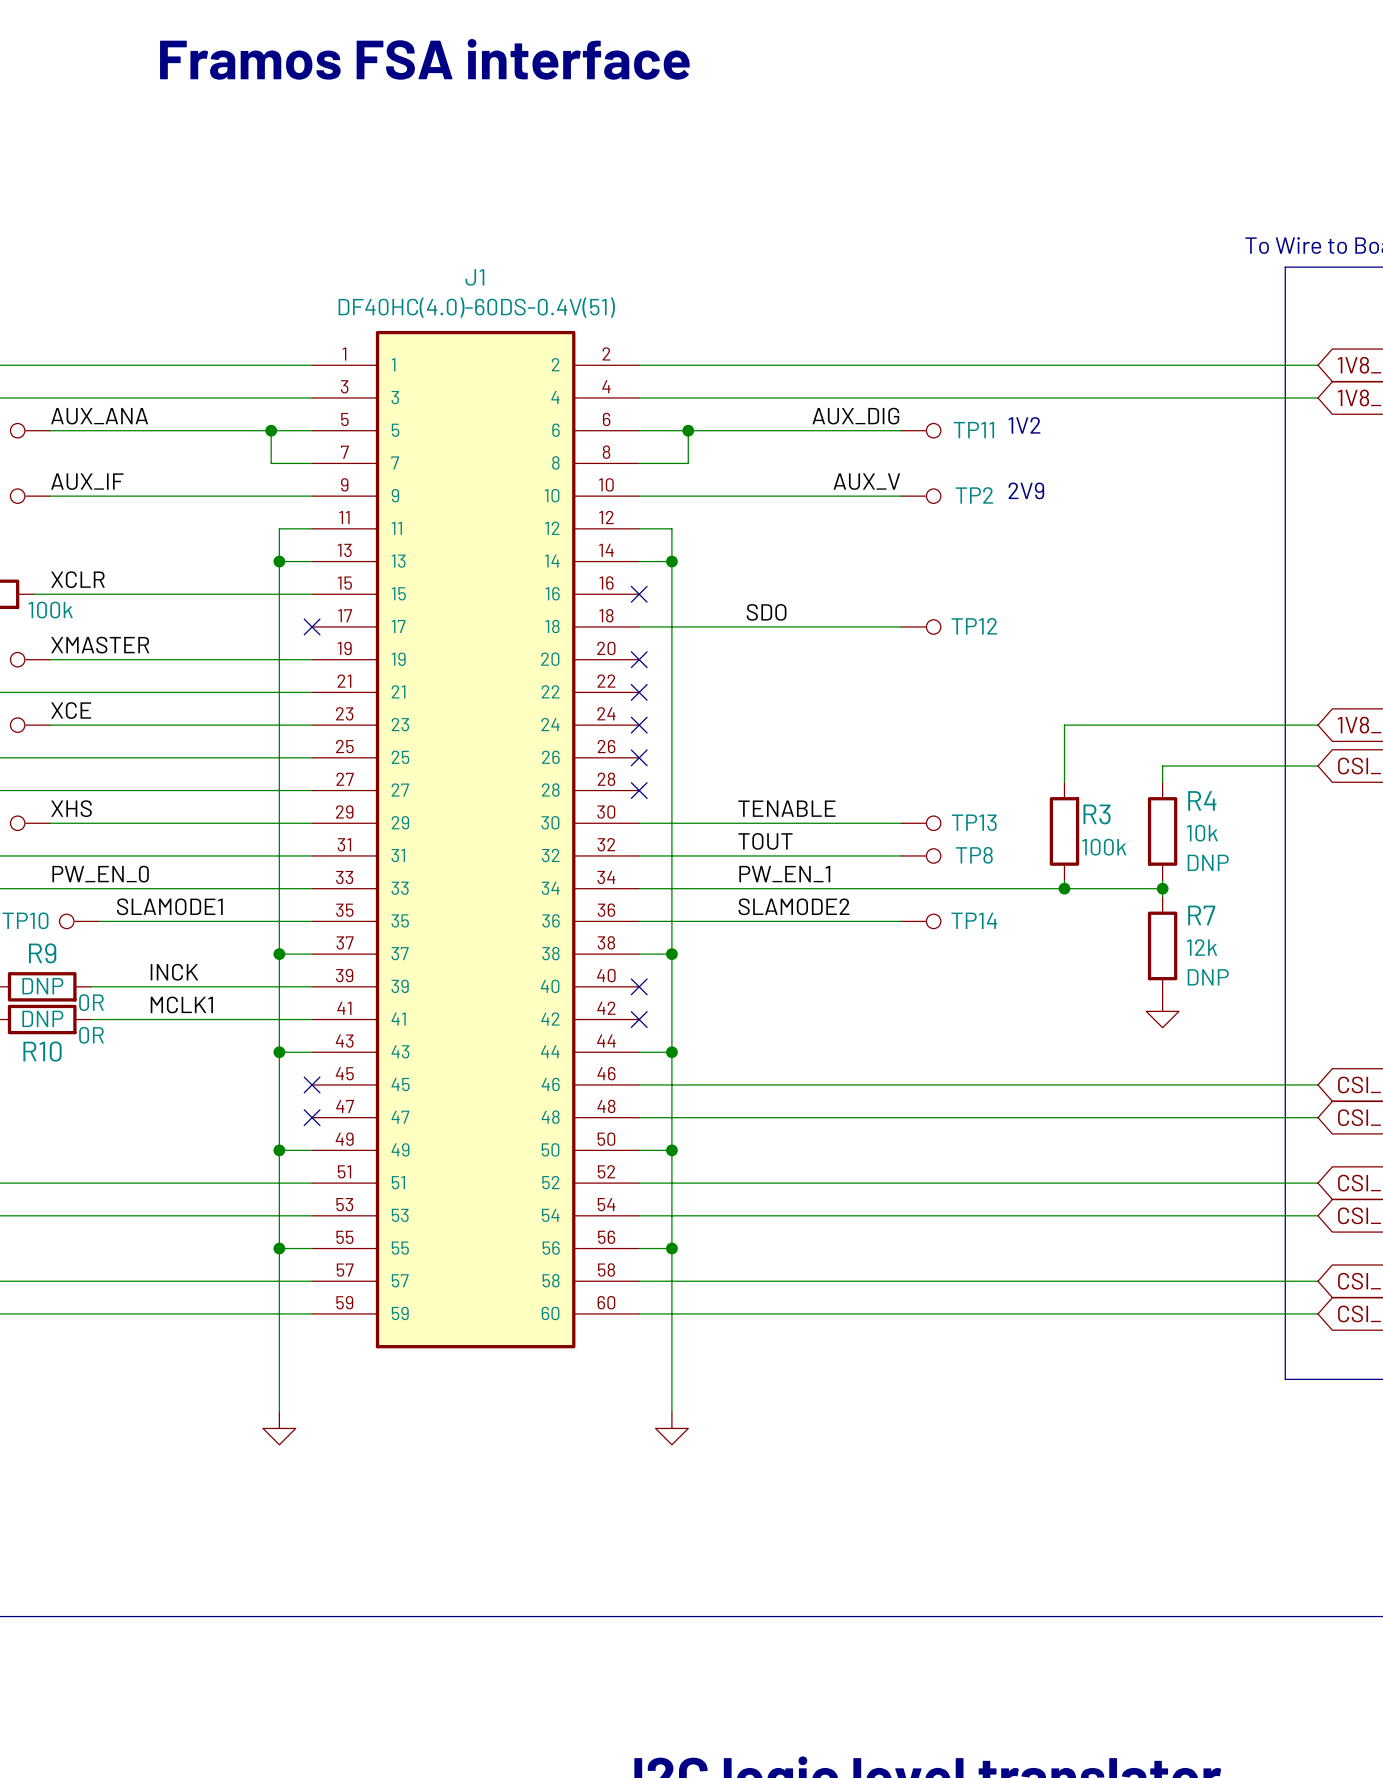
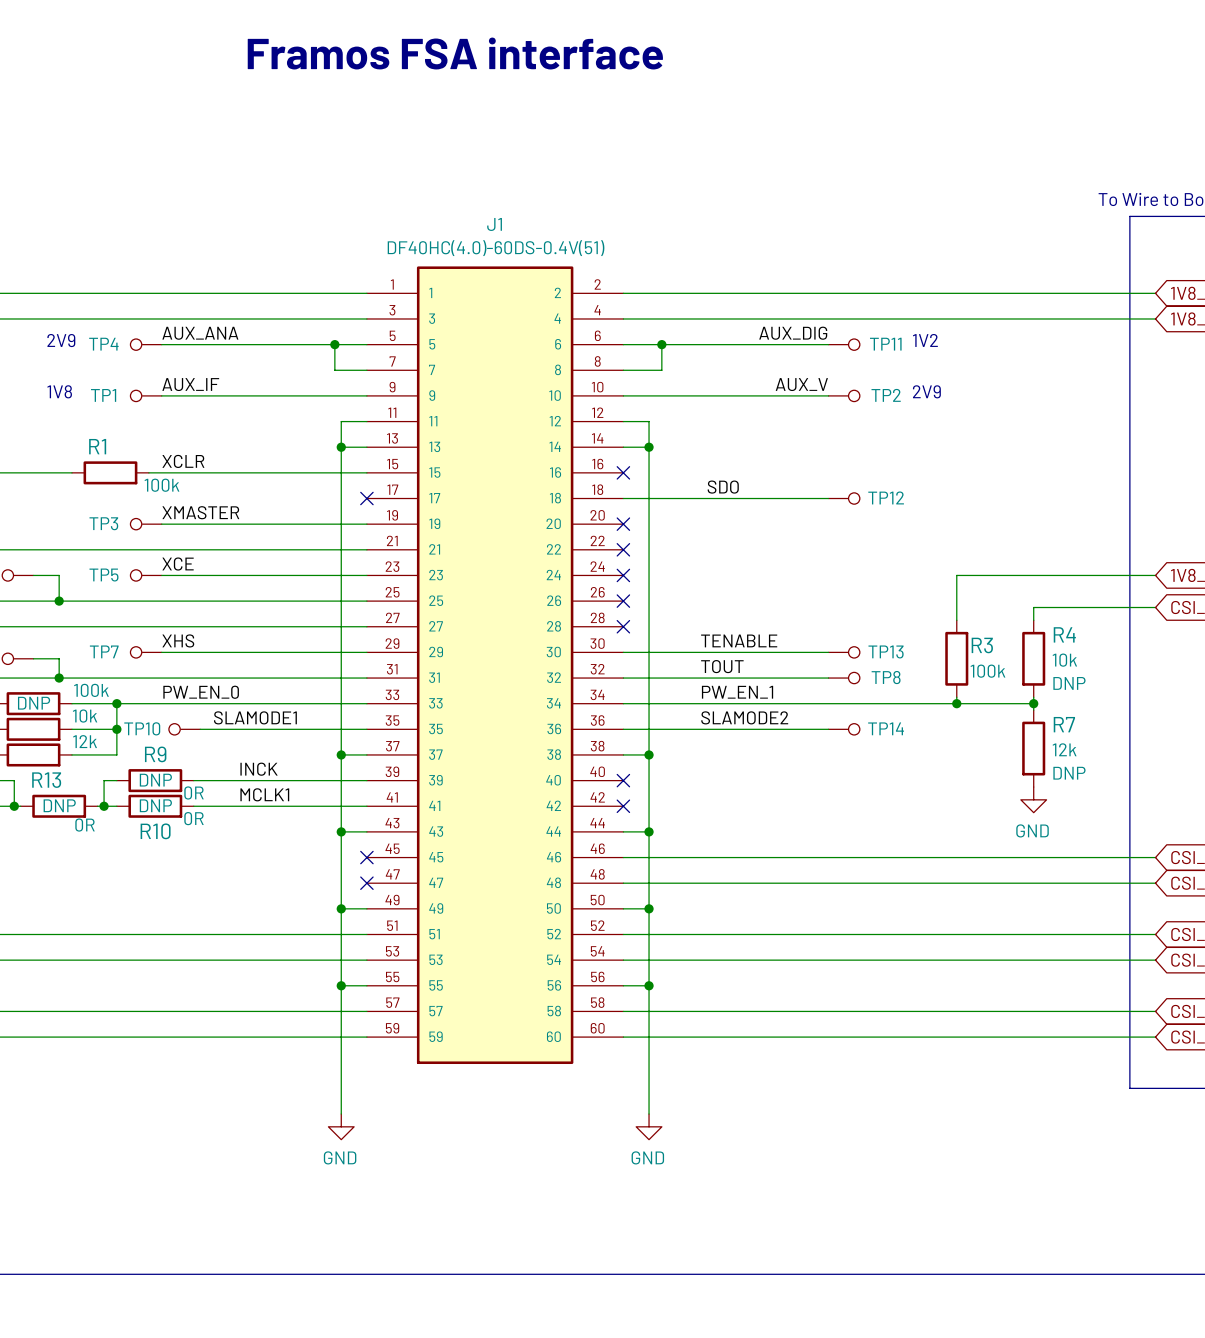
power symbol text: none -> GND (1032, 830)
power symbol text: none -> GND (340, 1157)
power symbol text: none -> GND (647, 1157)

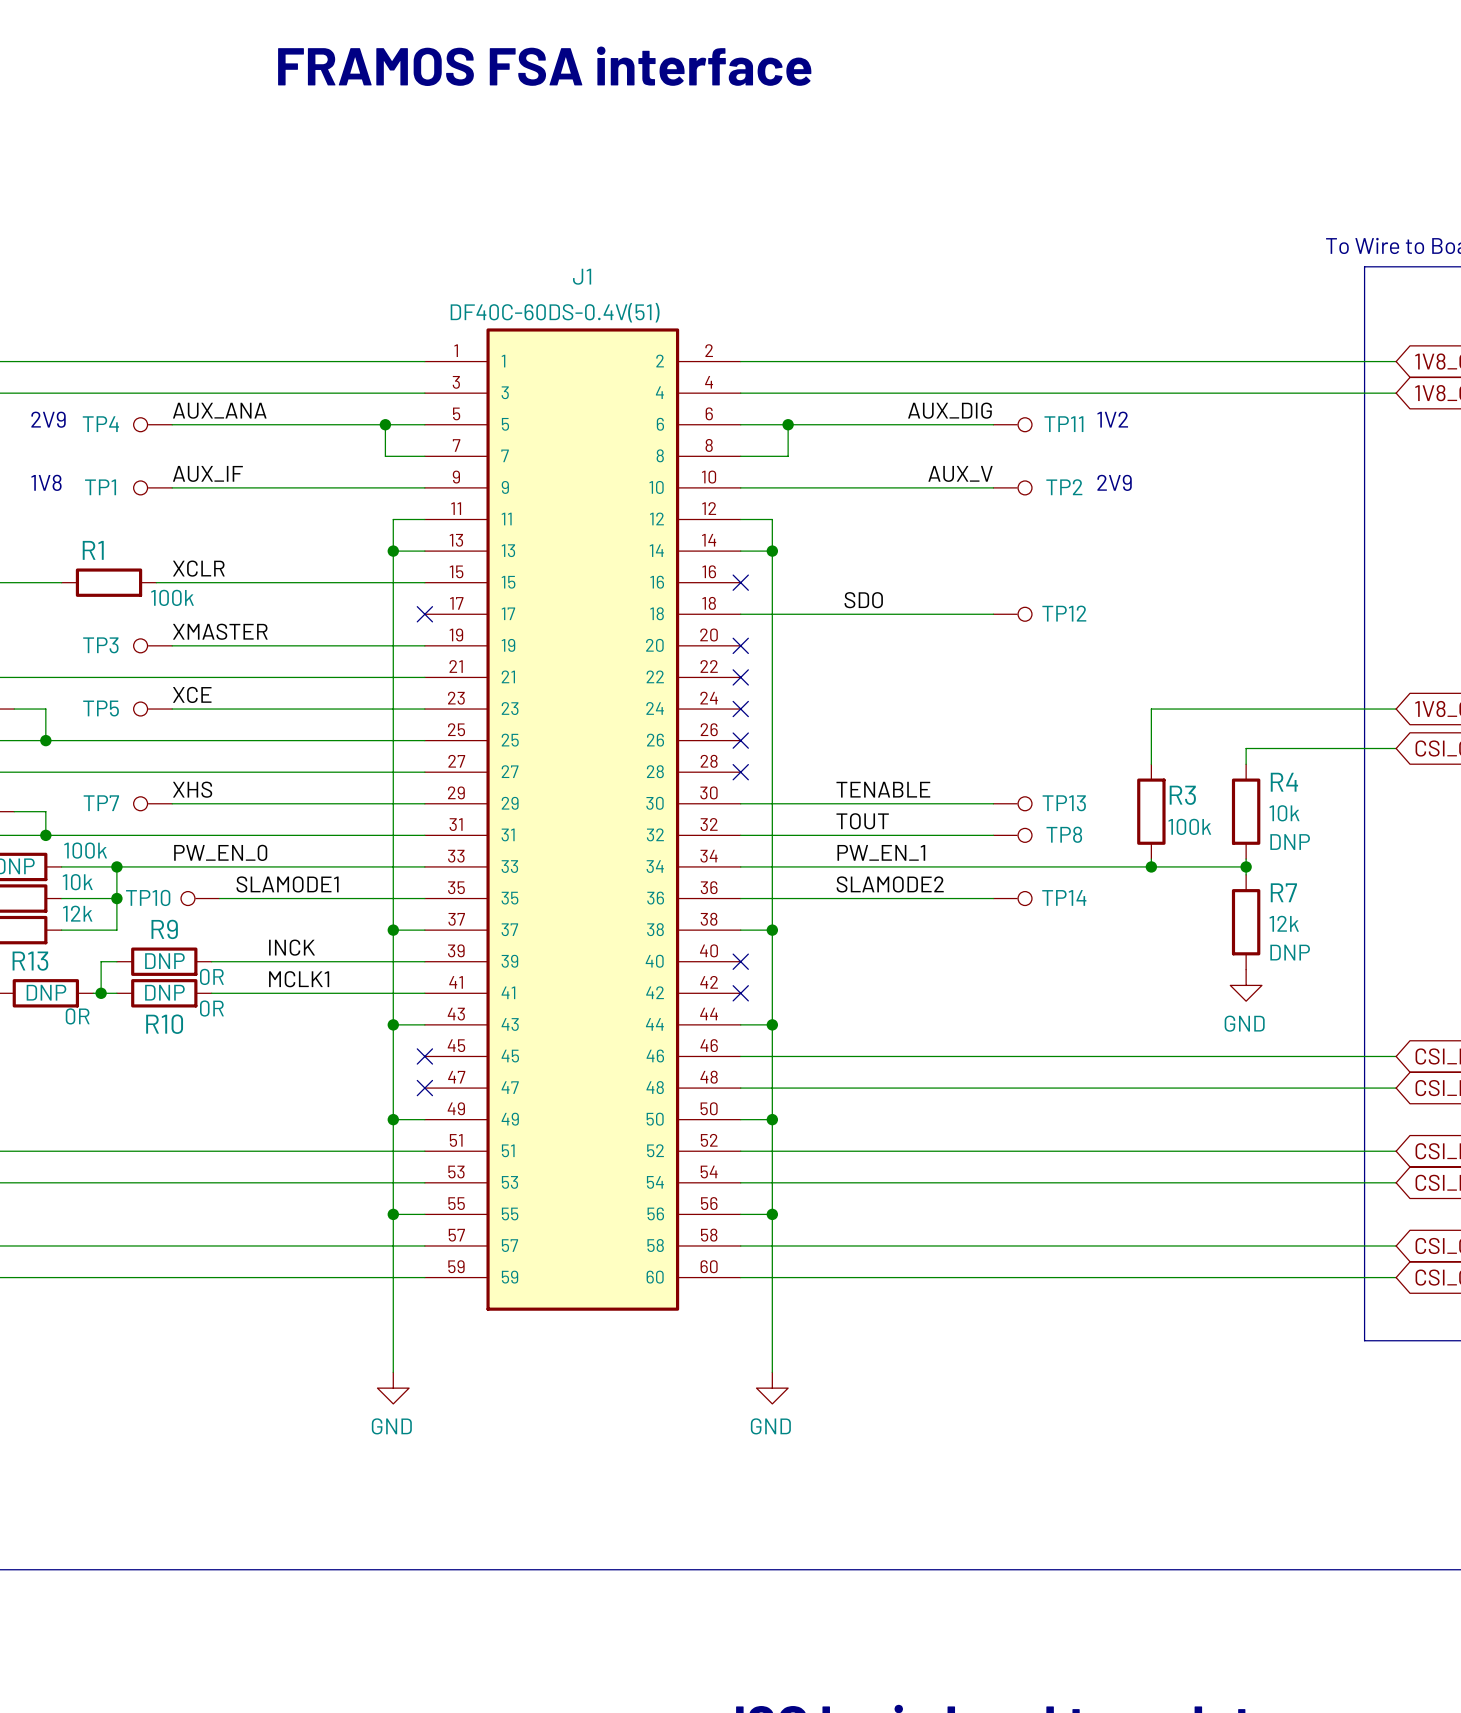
text: Framos FSA interface (455, 53) -> FRAMOS FSA interface (544, 66)
J1 value: DF40HC(4.0)-60DS-0.4V(51) (496, 248) -> DF40C-60DS-0.4V(51) (555, 312)

